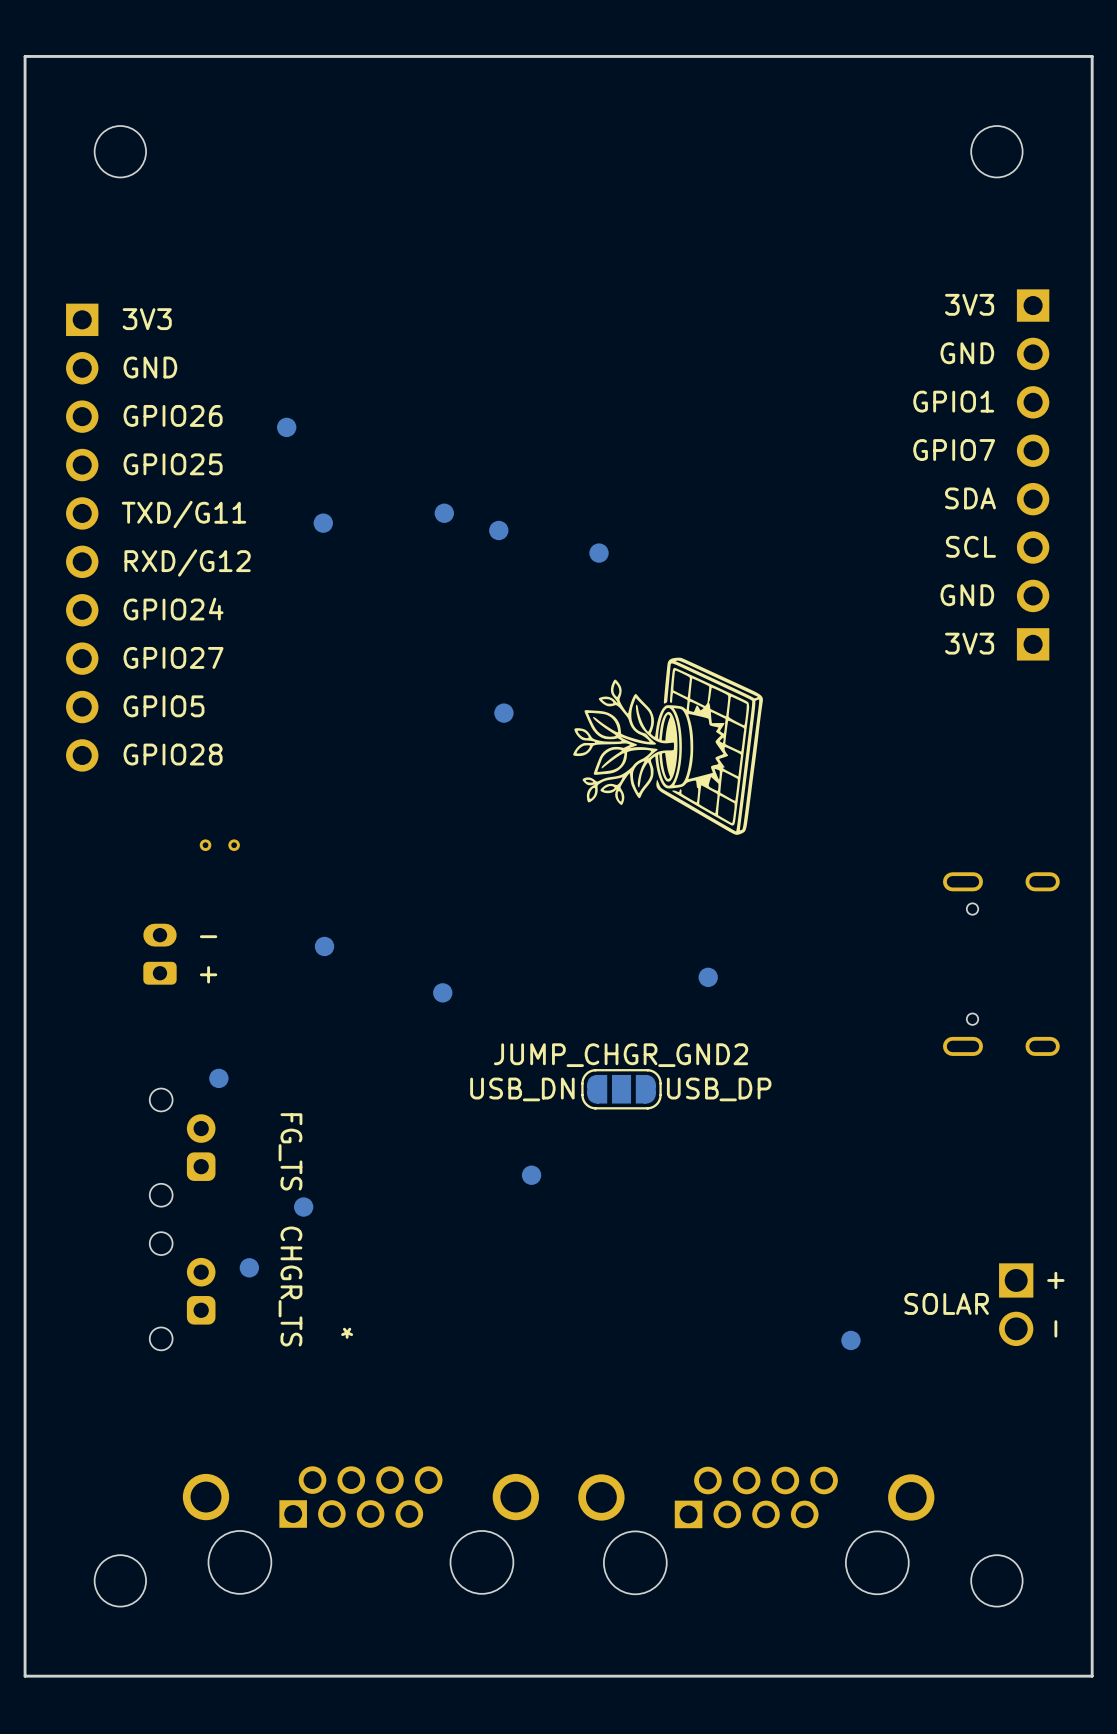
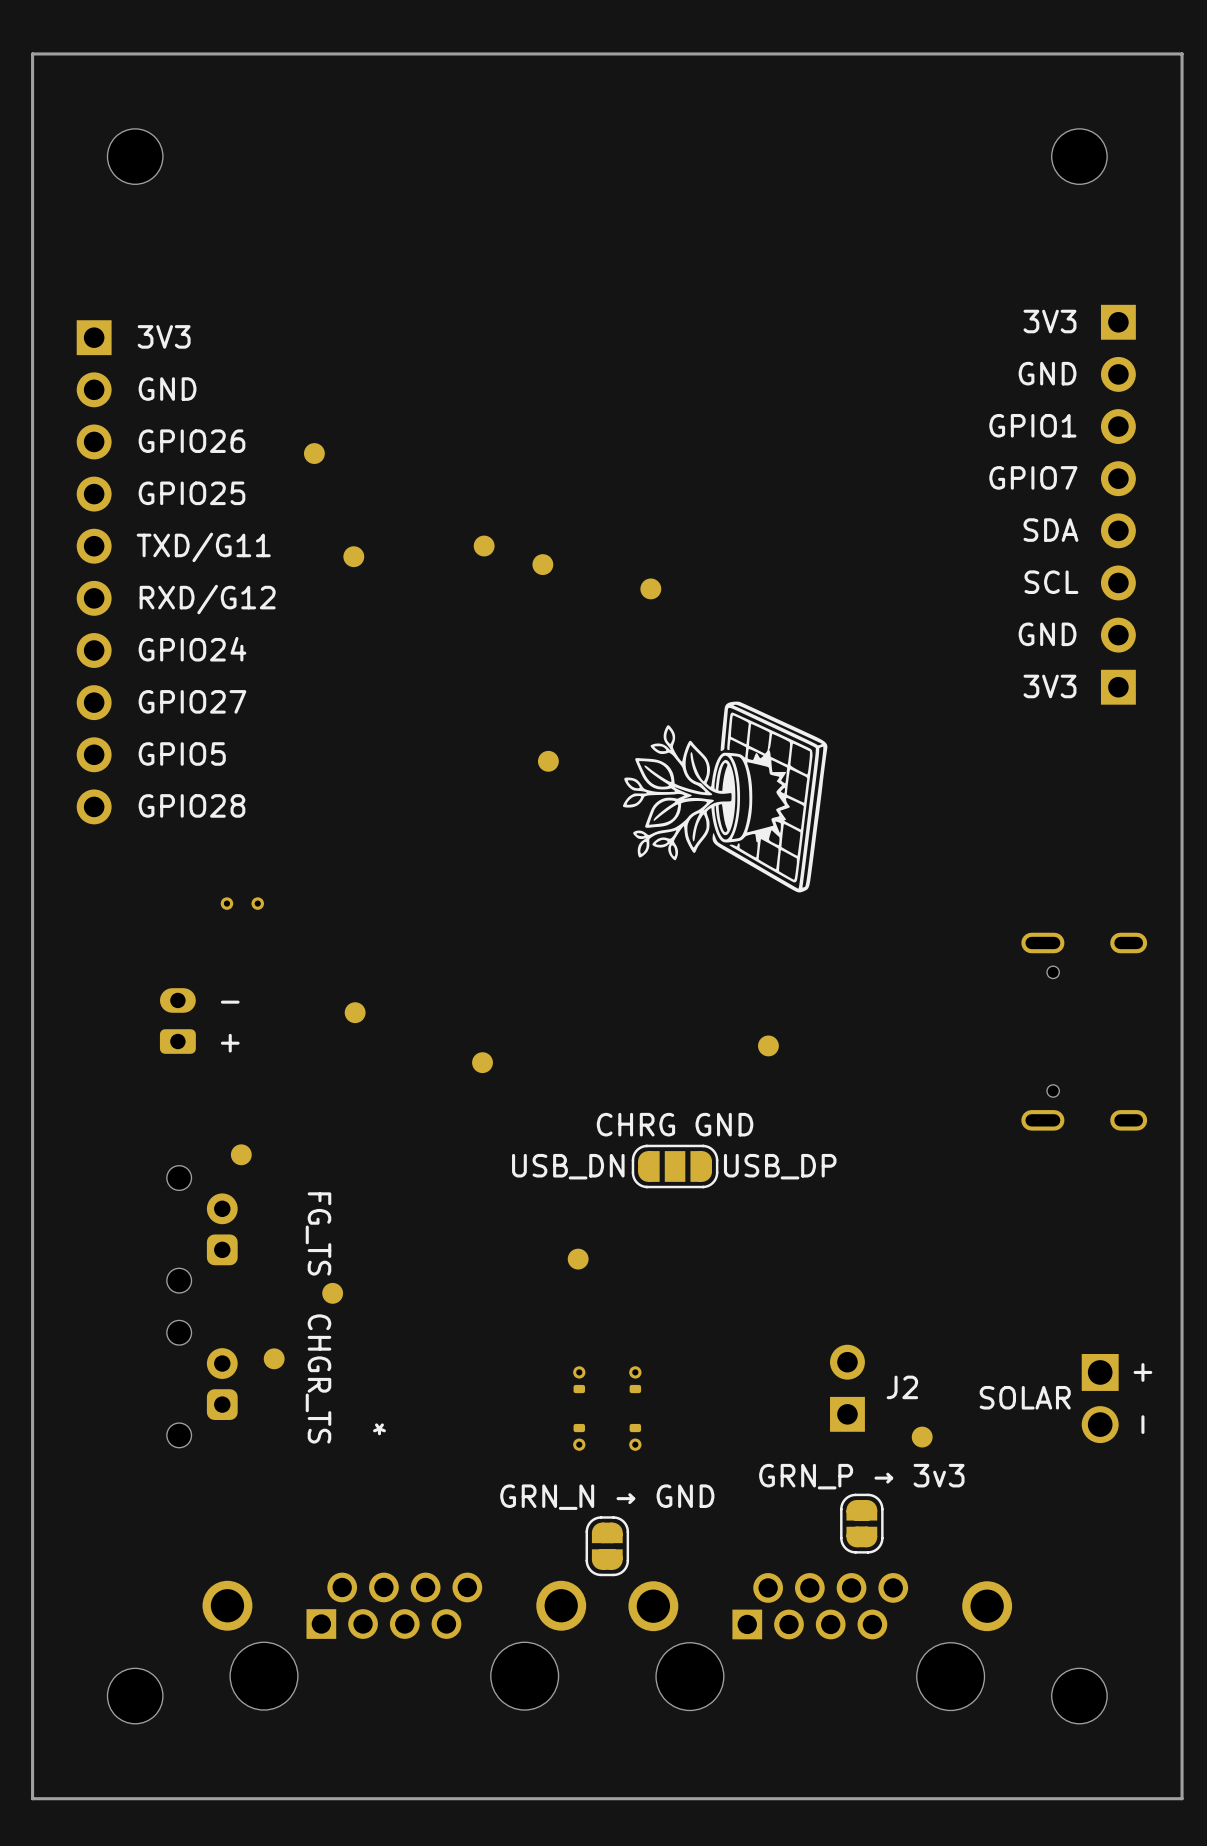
JUMP_CHGR_GND2 text: none -> CHRG GND (675, 1124)
JUMP_CHGR_GND2 name: JUMP_CHGR_GND2 (621, 1055) -> none
J2: none -> (847, 1388)
part: none -> (607, 1408)
part: none -> (861, 1523)
part: none -> (607, 1546)

